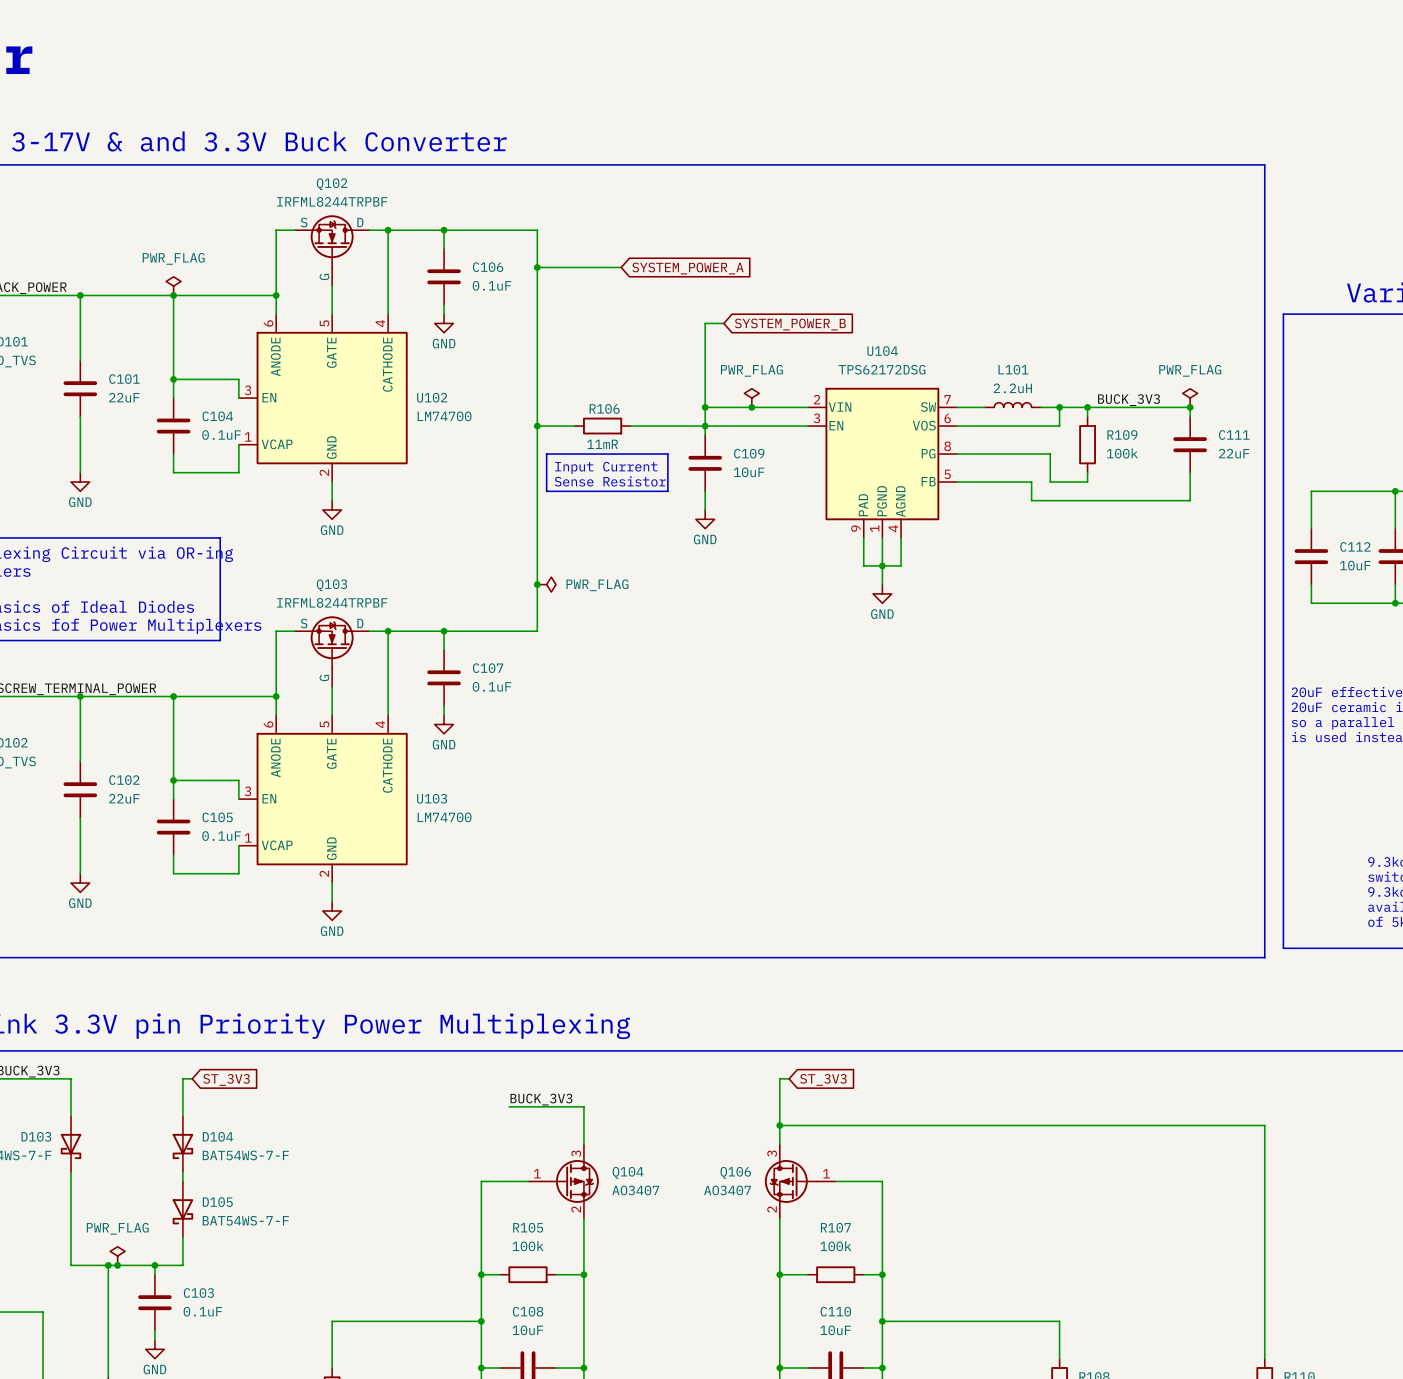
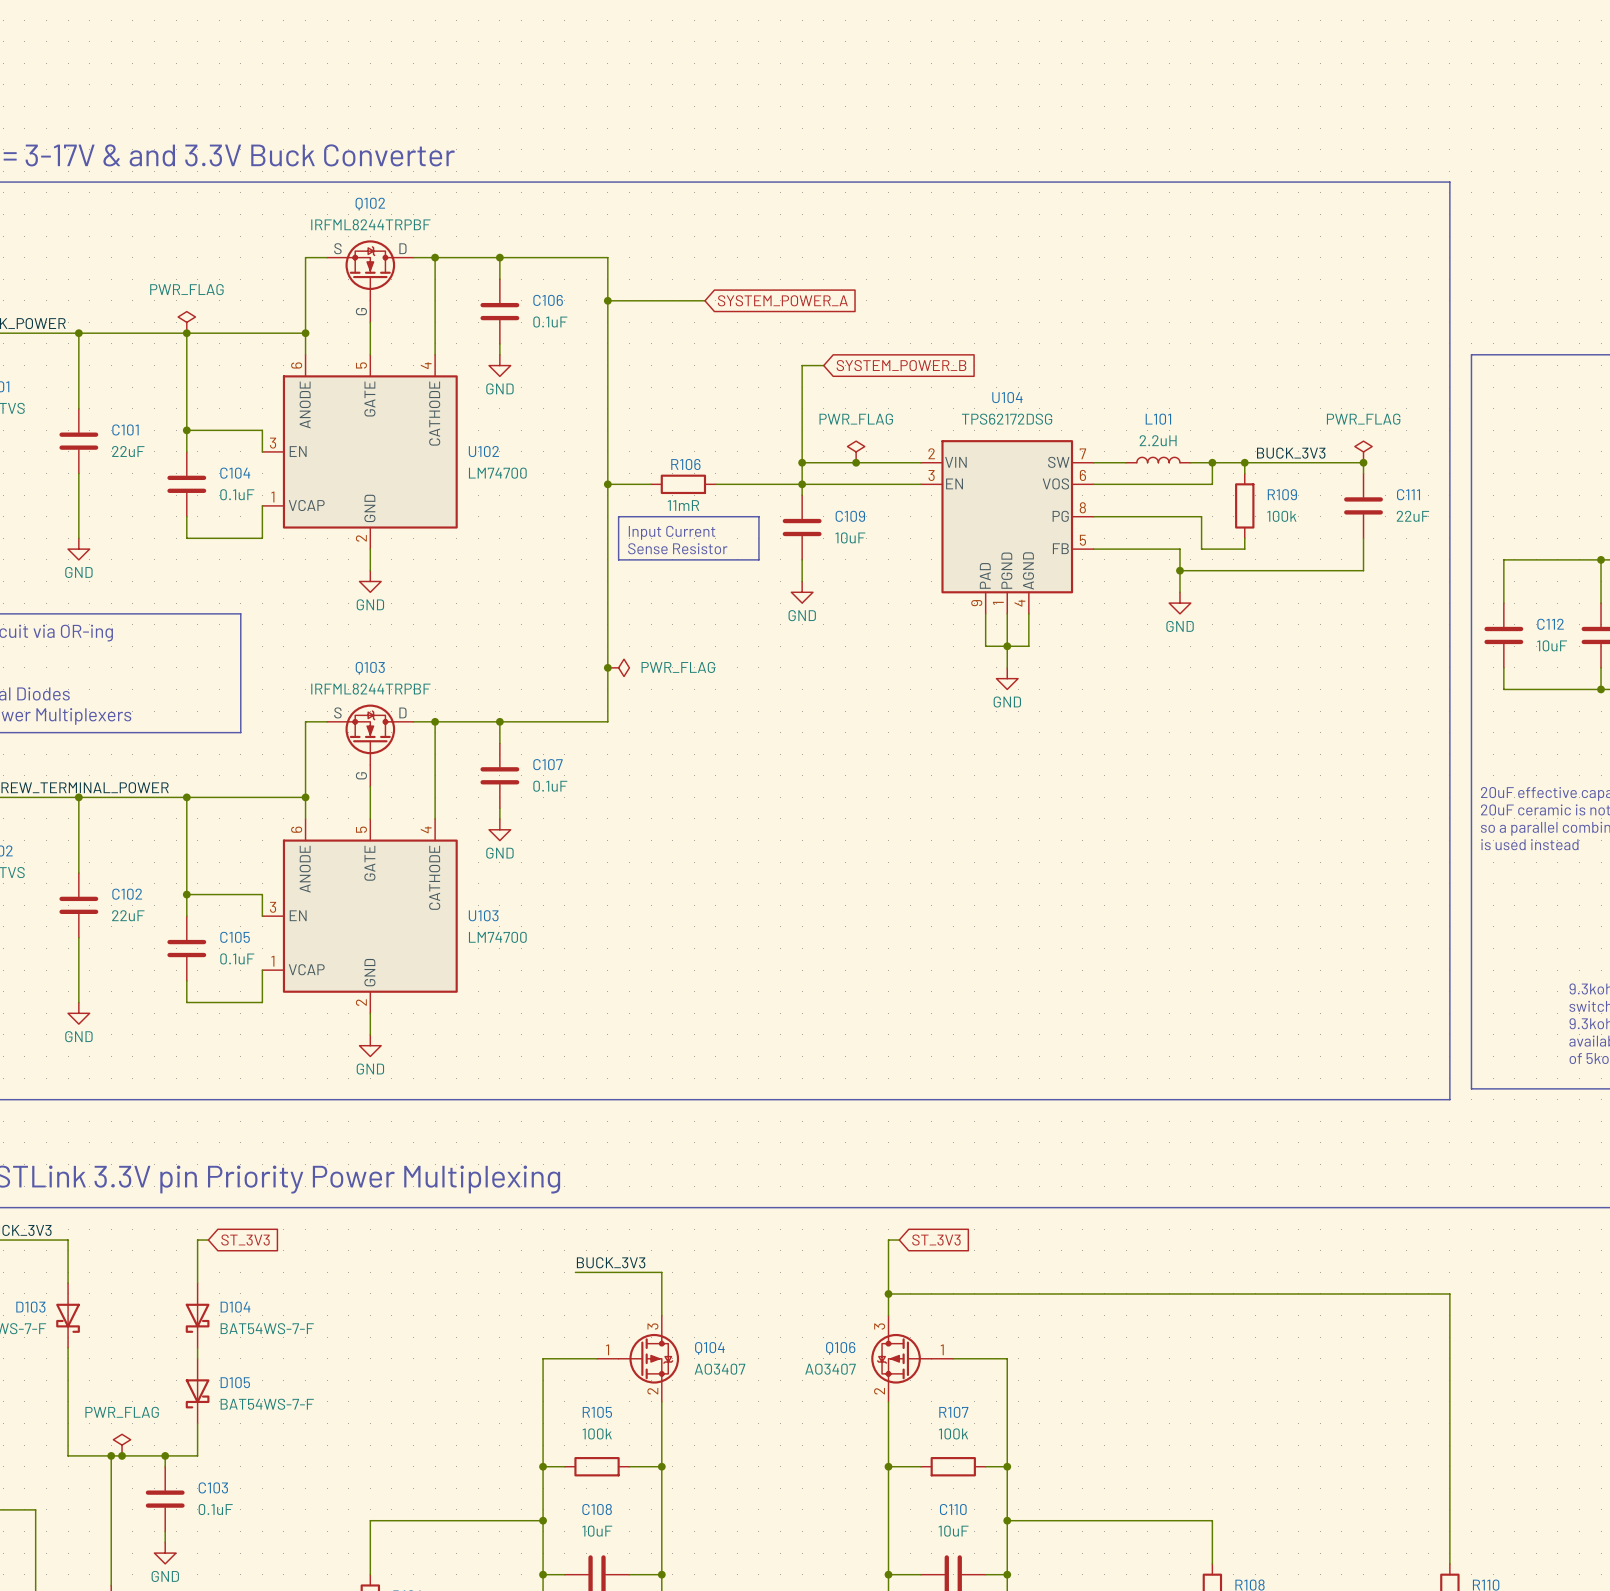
wire: none -> (1179, 570) (1179, 592)
junction: none -> (1179, 570)
power symbol: none -> GND (1179, 603)

